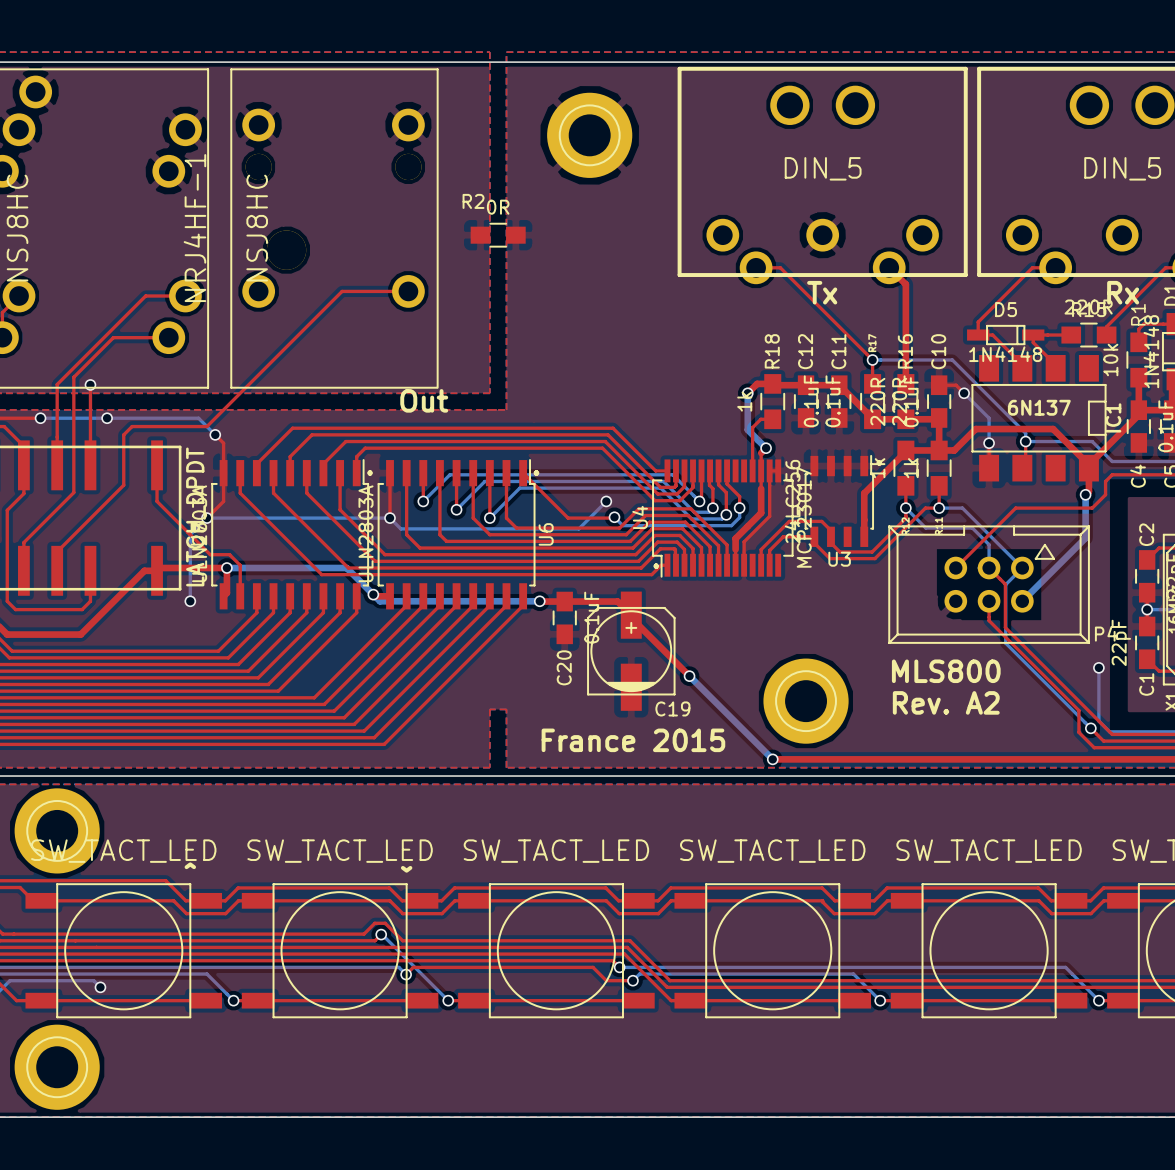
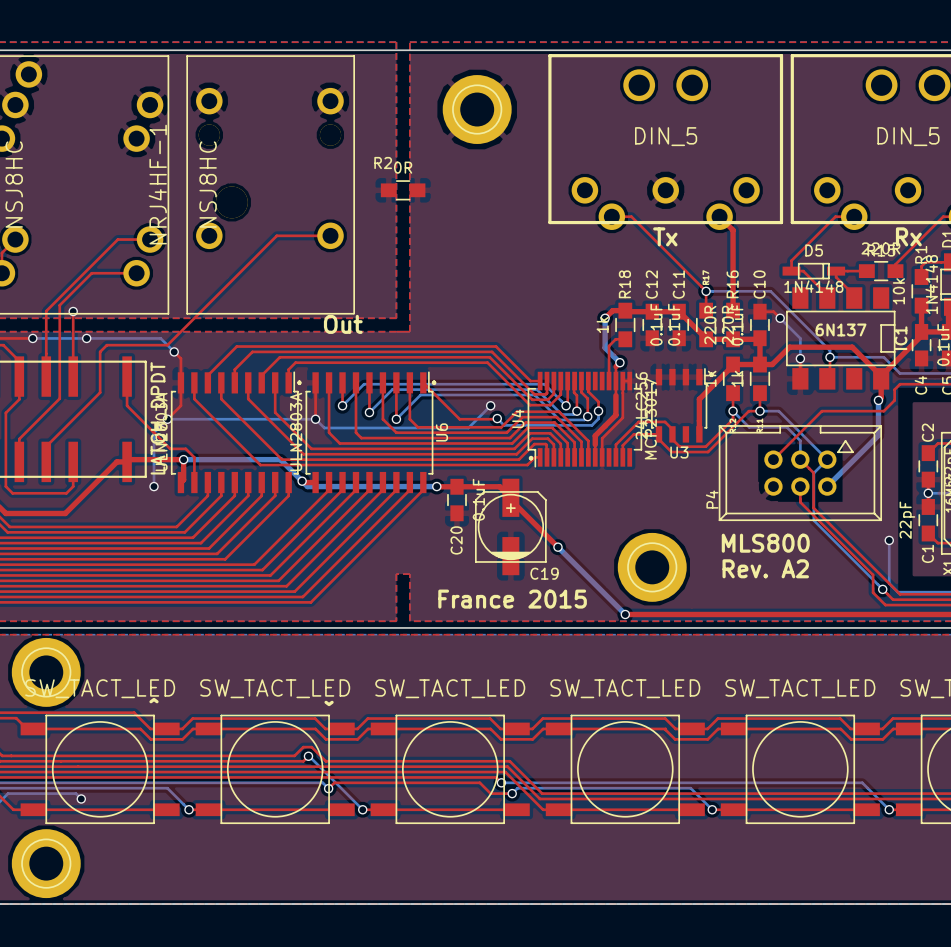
P4 name rotation: 0° (1106, 633) -> 90° counterclockwise (712, 499)
P4 name position: P4 (1106, 633) -> P4 (712, 499)

